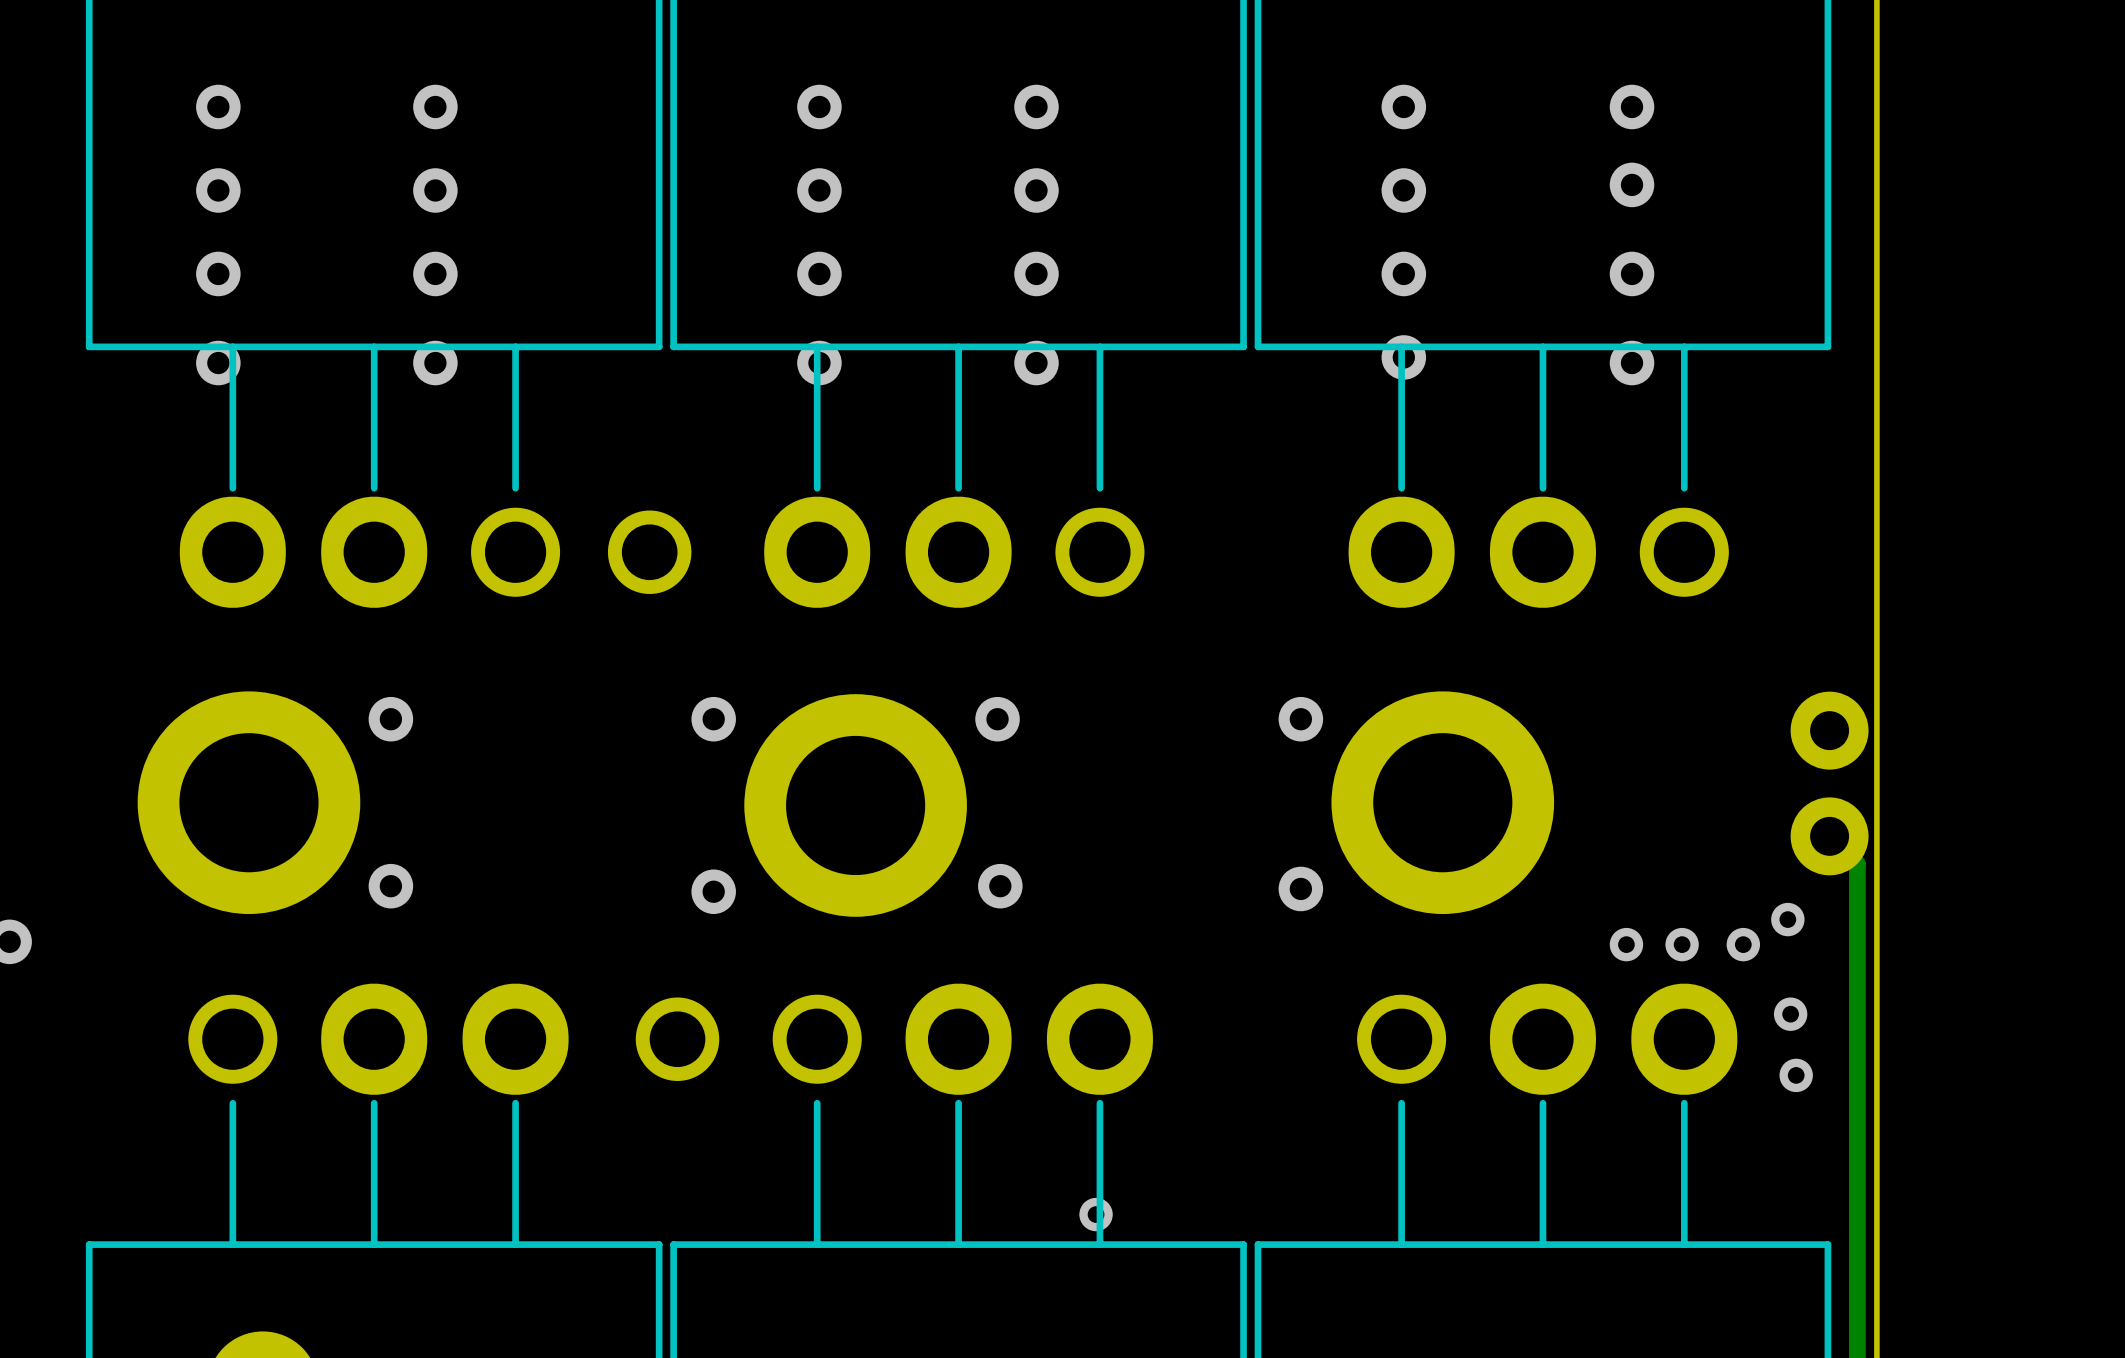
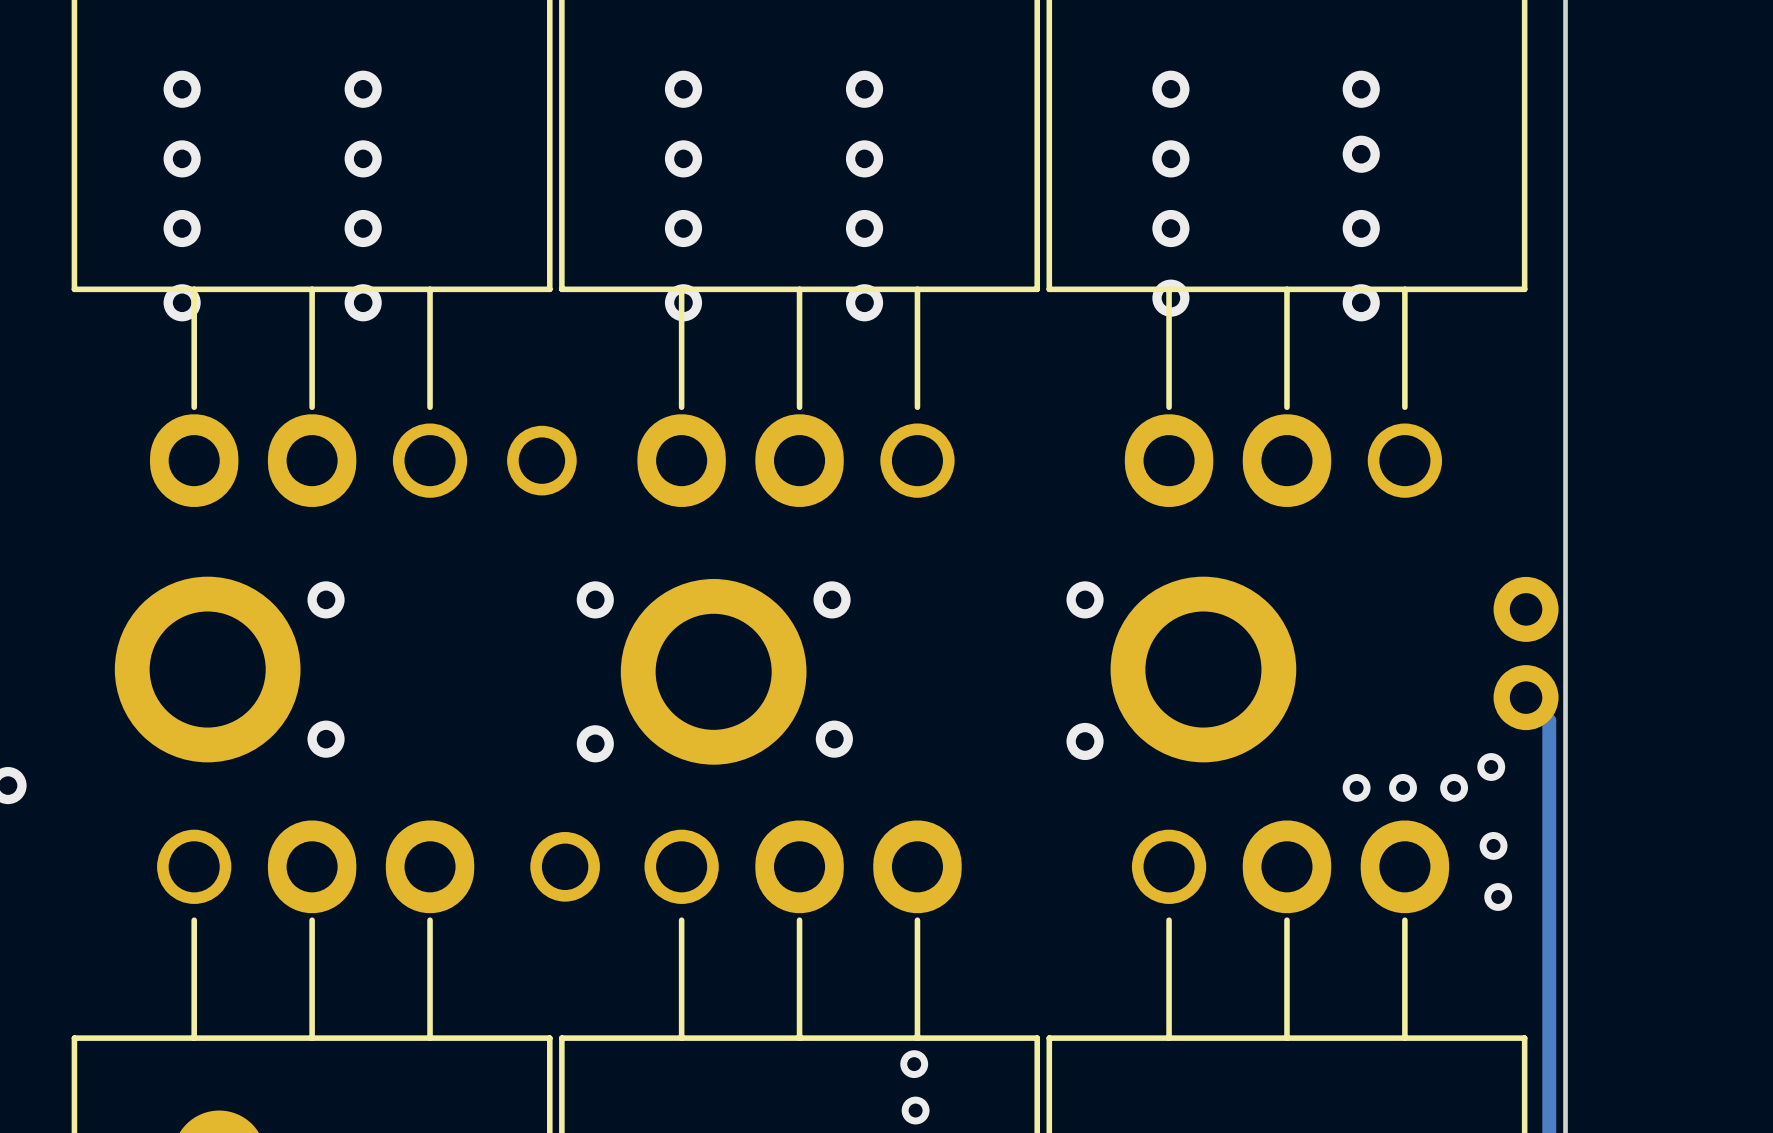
via: (1096, 1214) -> none
via: none -> (914, 1064)
via: none -> (915, 1110)

